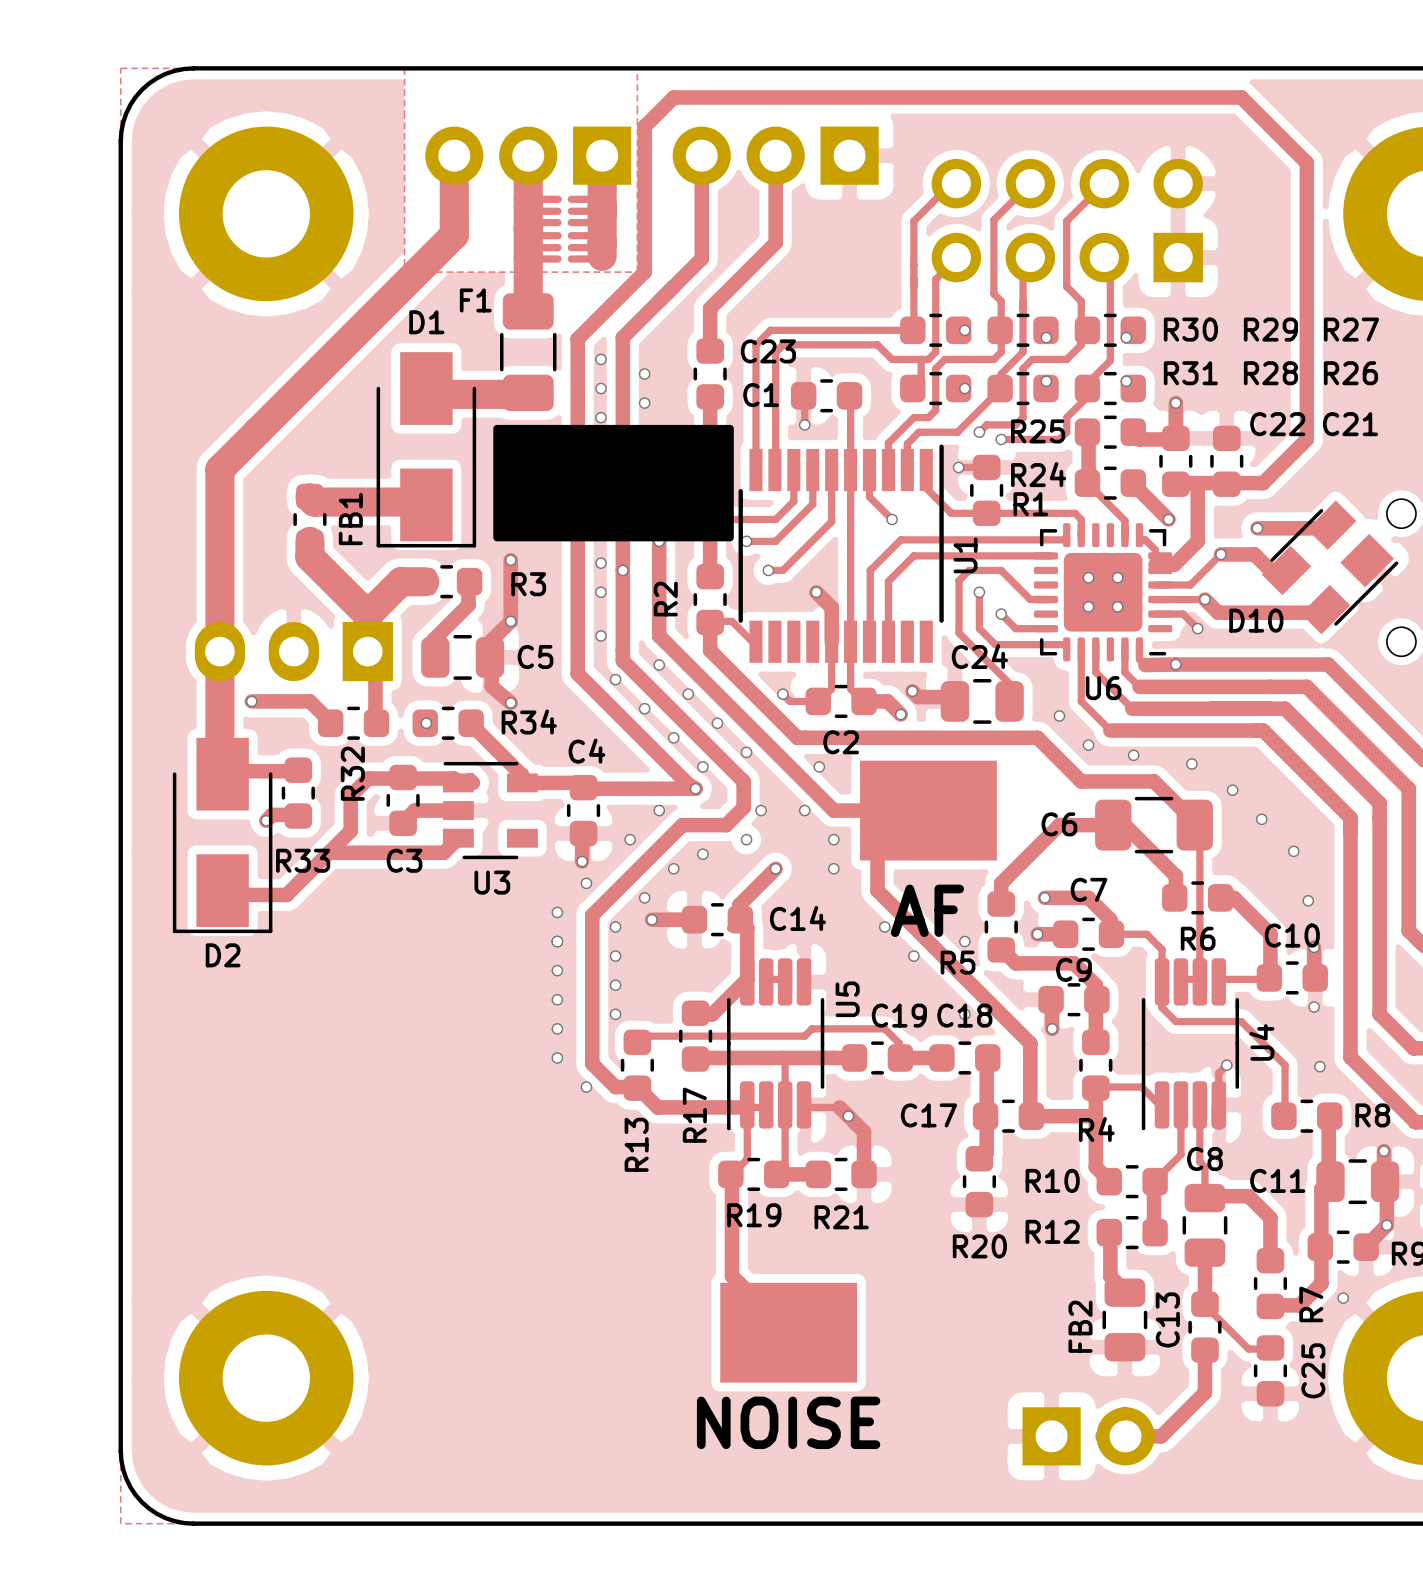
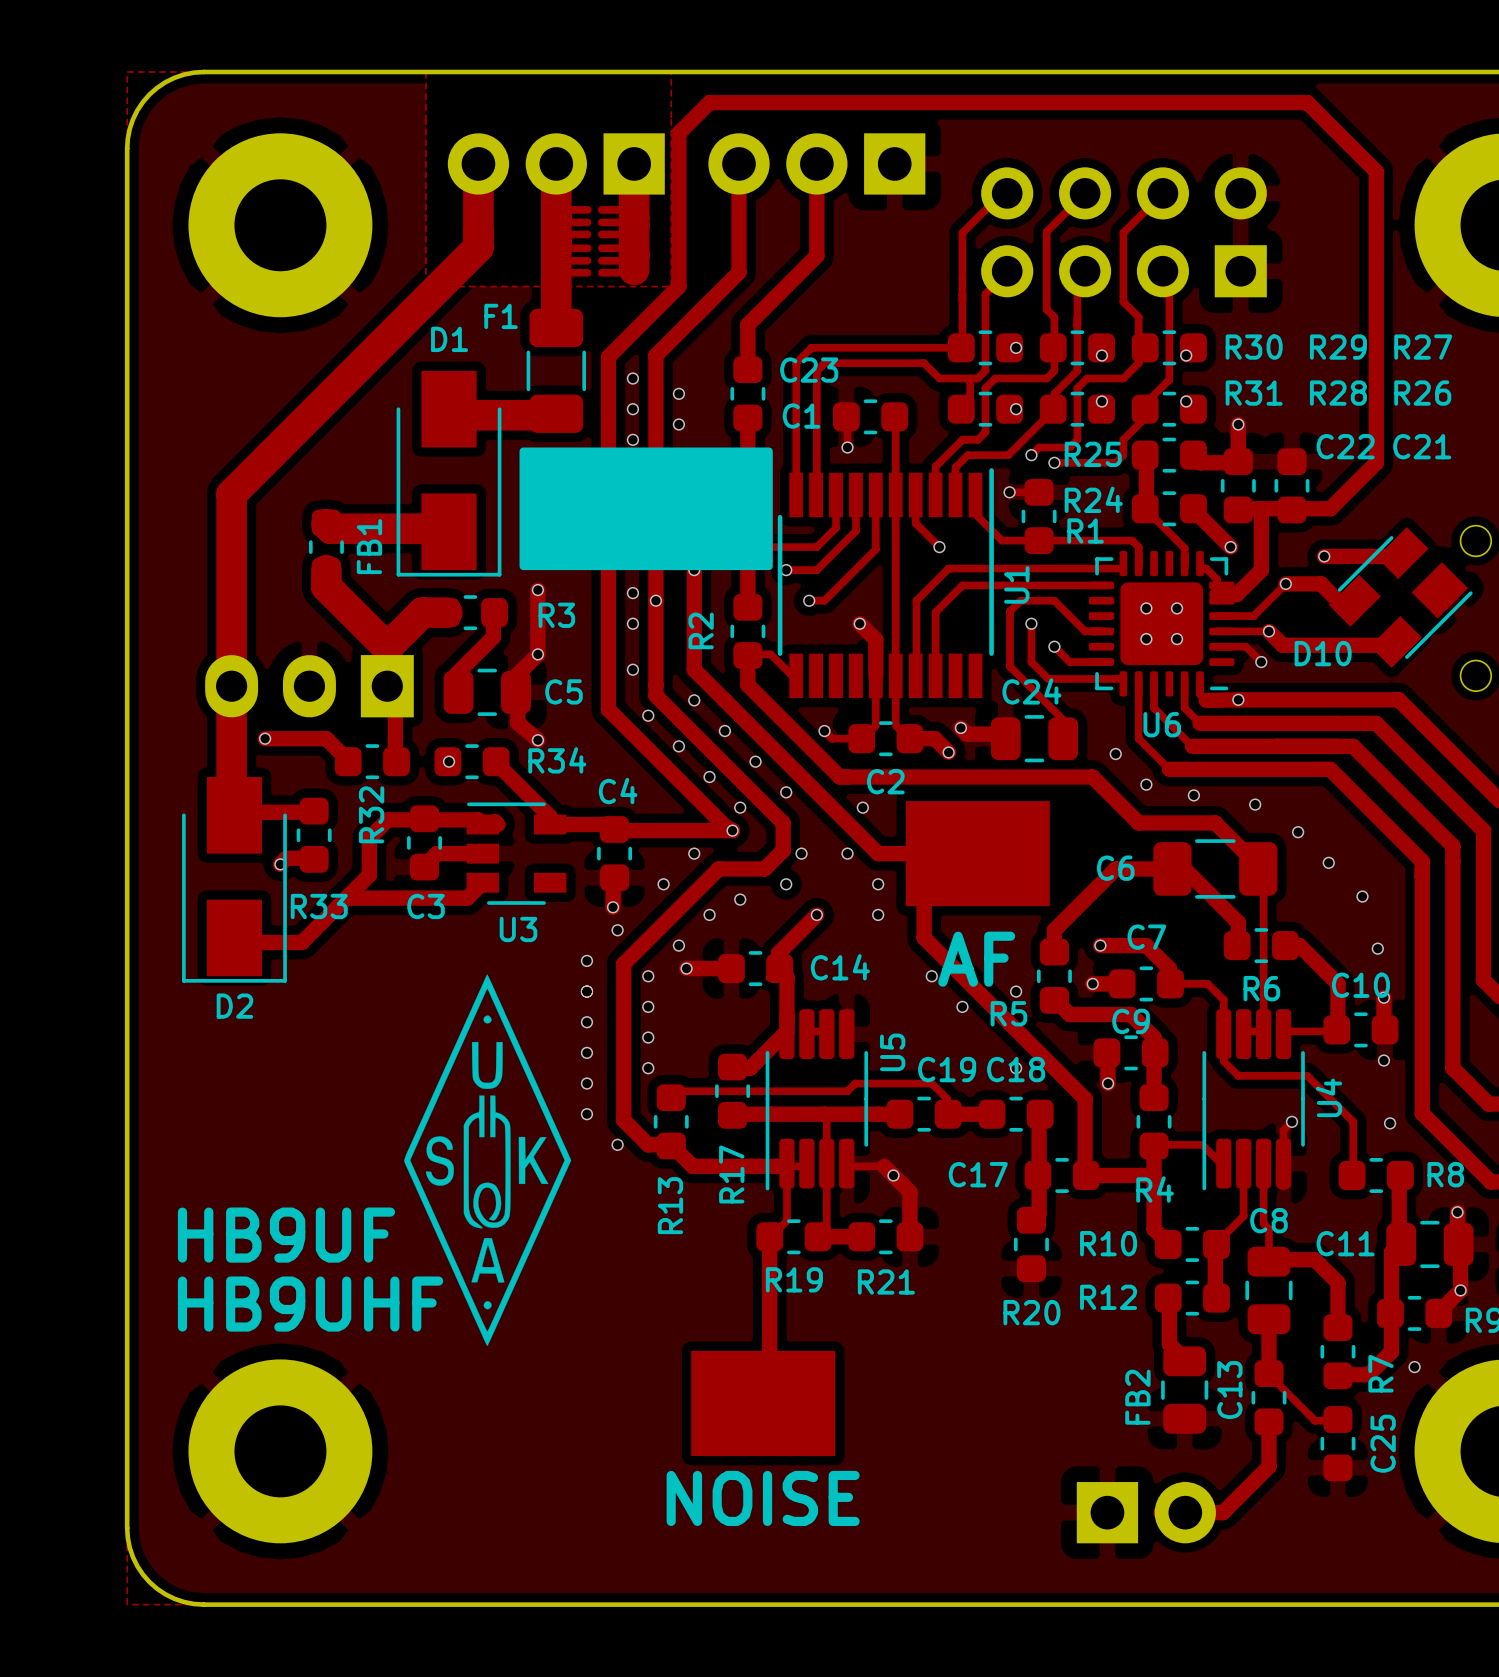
drawing: none -> [404, 974, 572, 1346]
text: none -> HB9UF (286, 1235)
track: (731, 1174) (731, 1276) (788, 1332) -> (769, 1236) (769, 1396) (763, 1403)
text: none -> HB9UHF (310, 1304)
part position: (788, 1332) -> (763, 1403)

